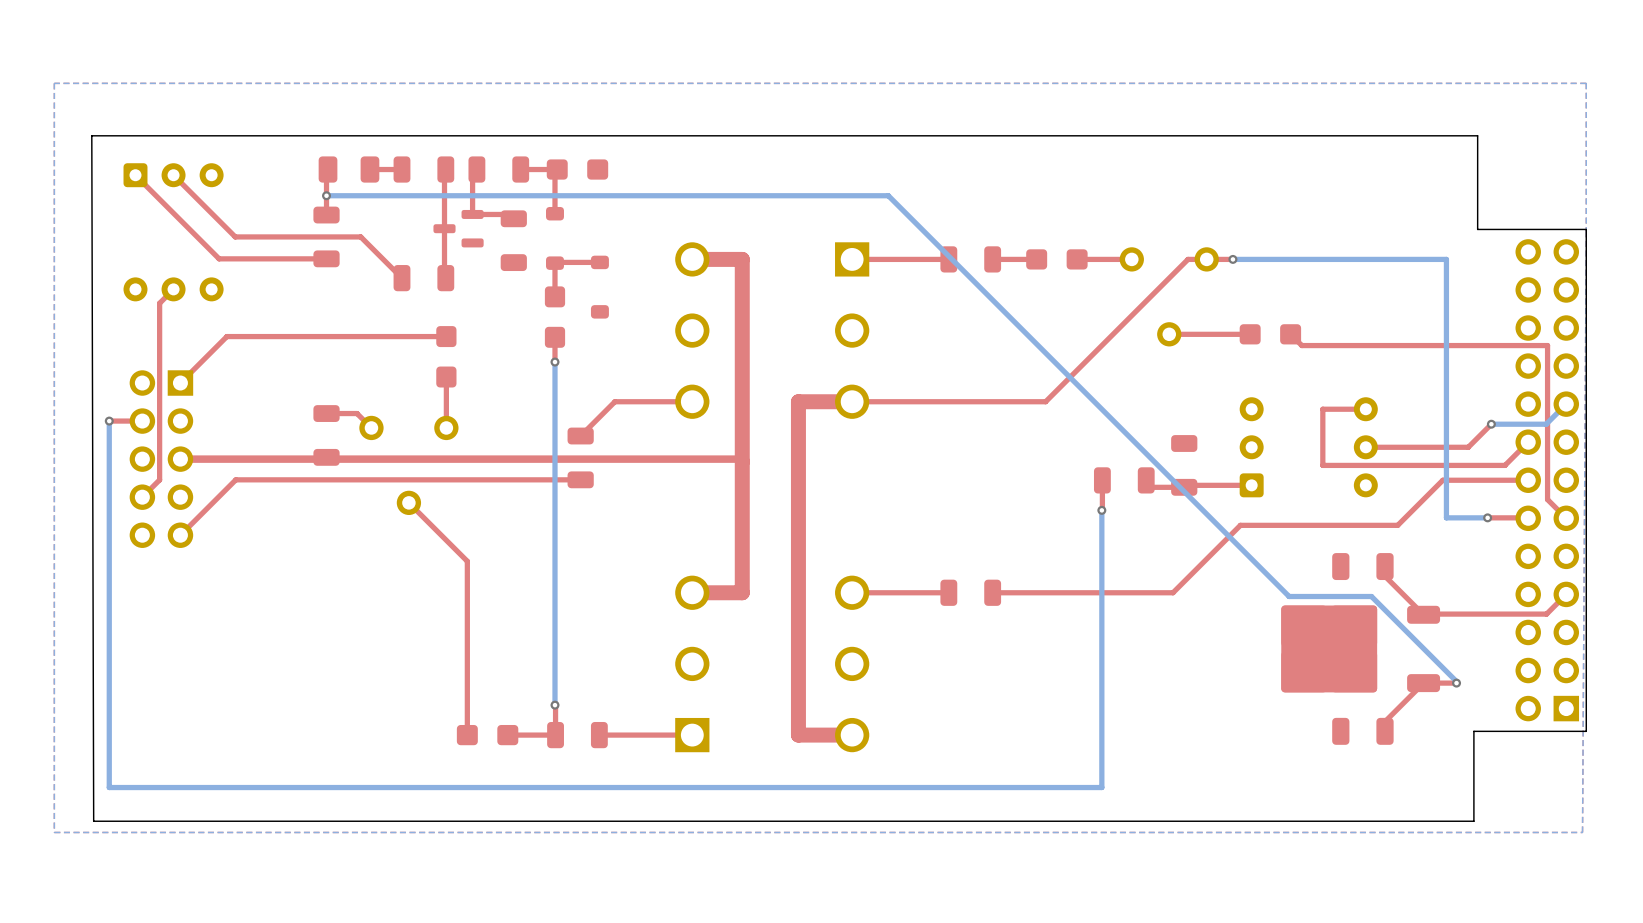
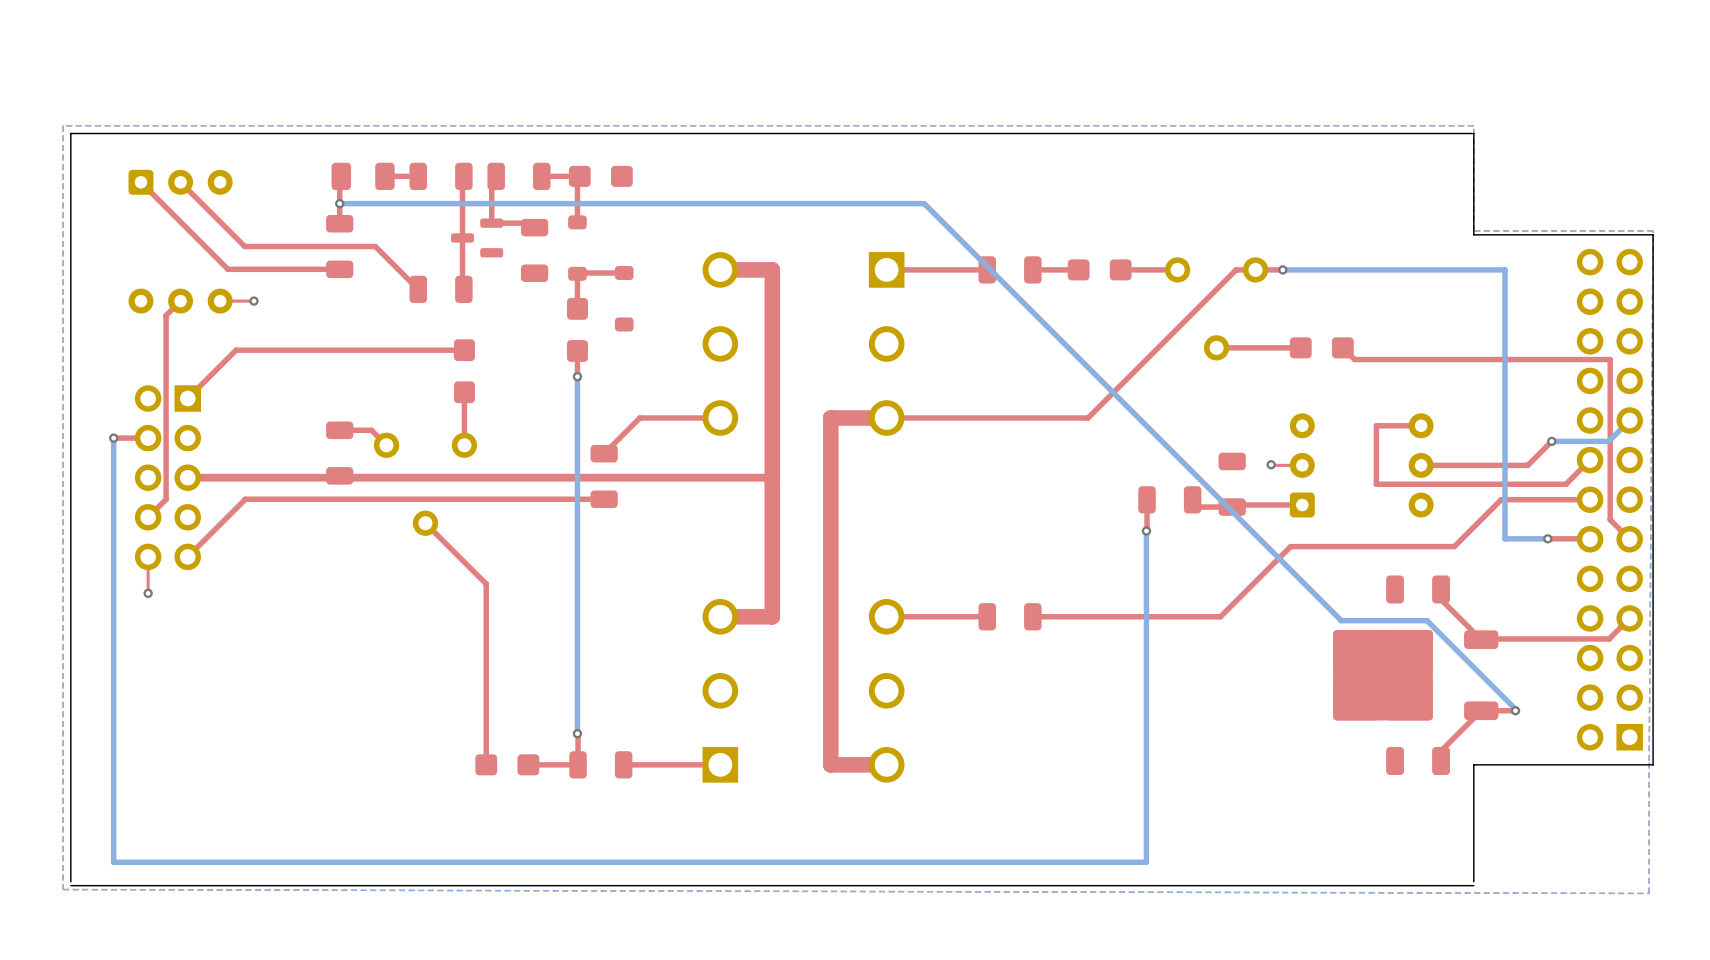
bottom zone outline: (1586, 83) (1582, 832) (54, 832) (54, 83) (1586, 83) -> (1473, 125) (1473, 230) (1653, 230) (1649, 893) (63, 889) (63, 125) (1473, 125)
board edge: (1477, 135) (1477, 229) (1586, 229) (1586, 731) (1473, 731) (1473, 821) (93, 821) (91, 135) (1477, 135) -> none
top track: none -> (253, 301) (220, 301)
via: none -> (253, 301)
top track: none -> (1271, 464) (1302, 465)
via: none -> (1271, 464)
top track: none -> (148, 556) (148, 593)
via: none -> (148, 593)
bottom track: (1101, 787) (109, 787) -> (1146, 819) (1146, 862) (113, 862) (113, 819)
board edge: none -> (1473, 881) (1473, 764) (1653, 764) (1653, 234) (1473, 234) (1473, 133) (70, 133) (70, 881)
board edge: none -> (1473, 885) (70, 885)

